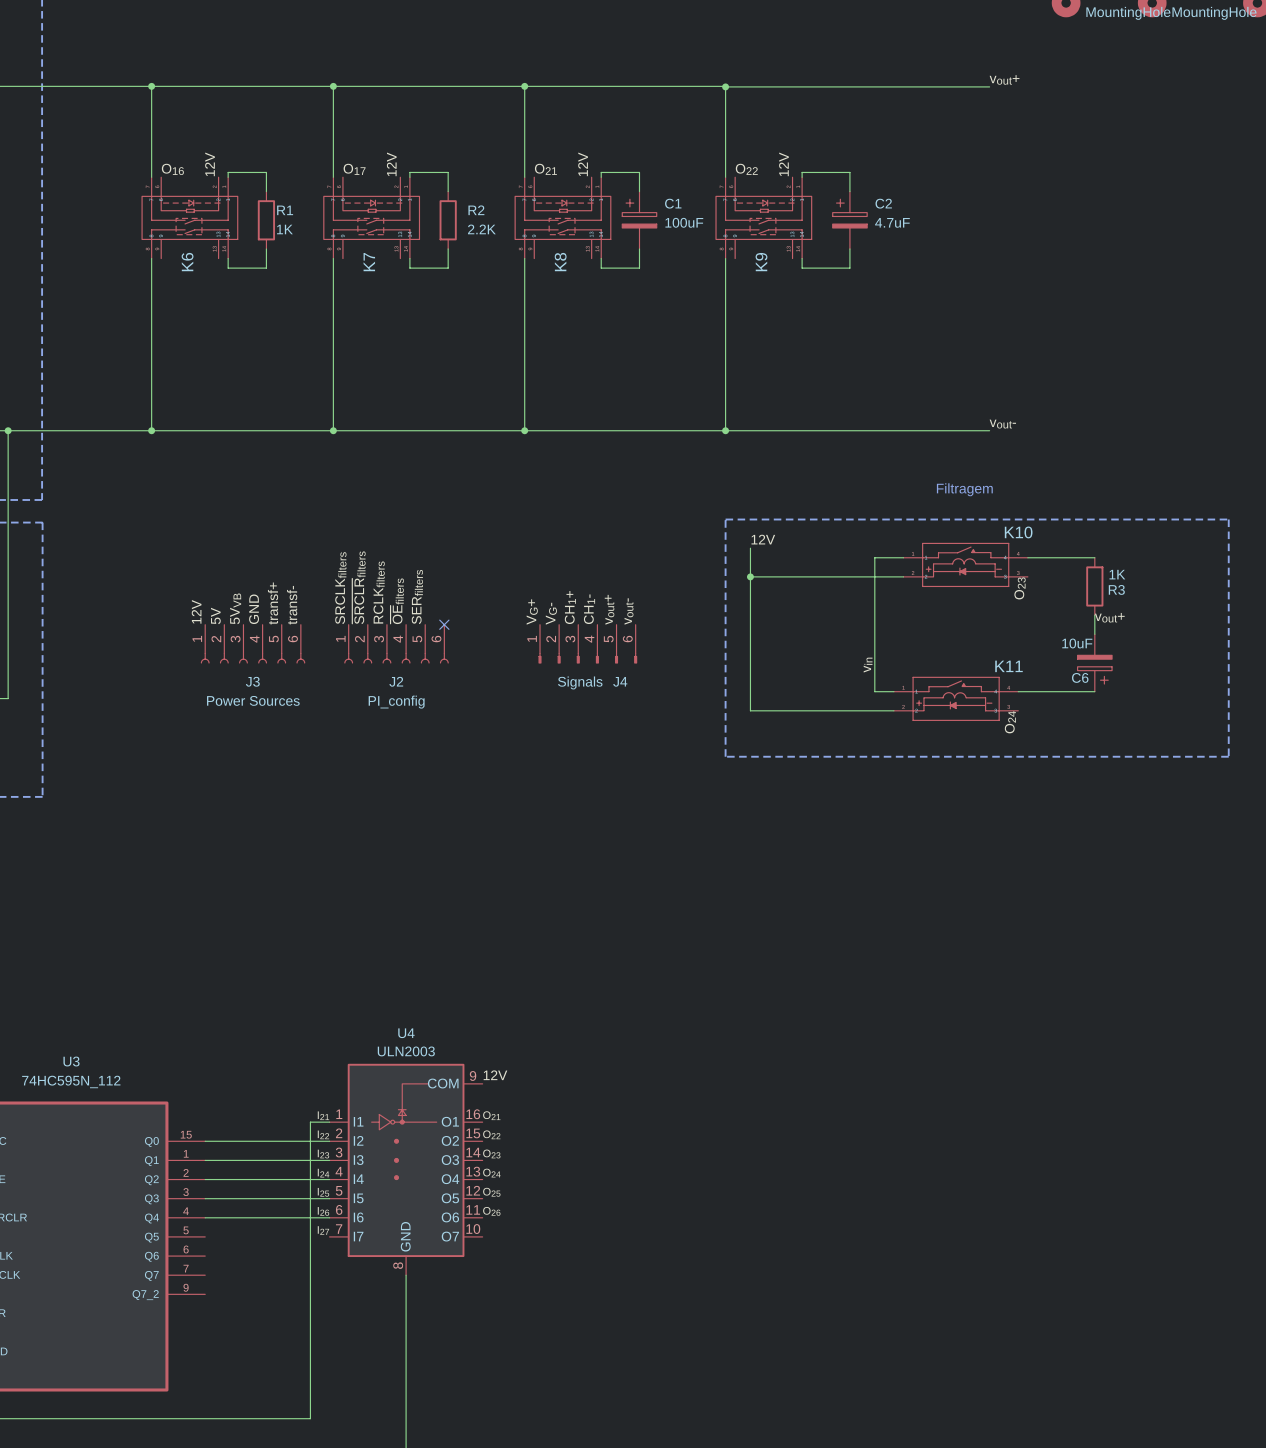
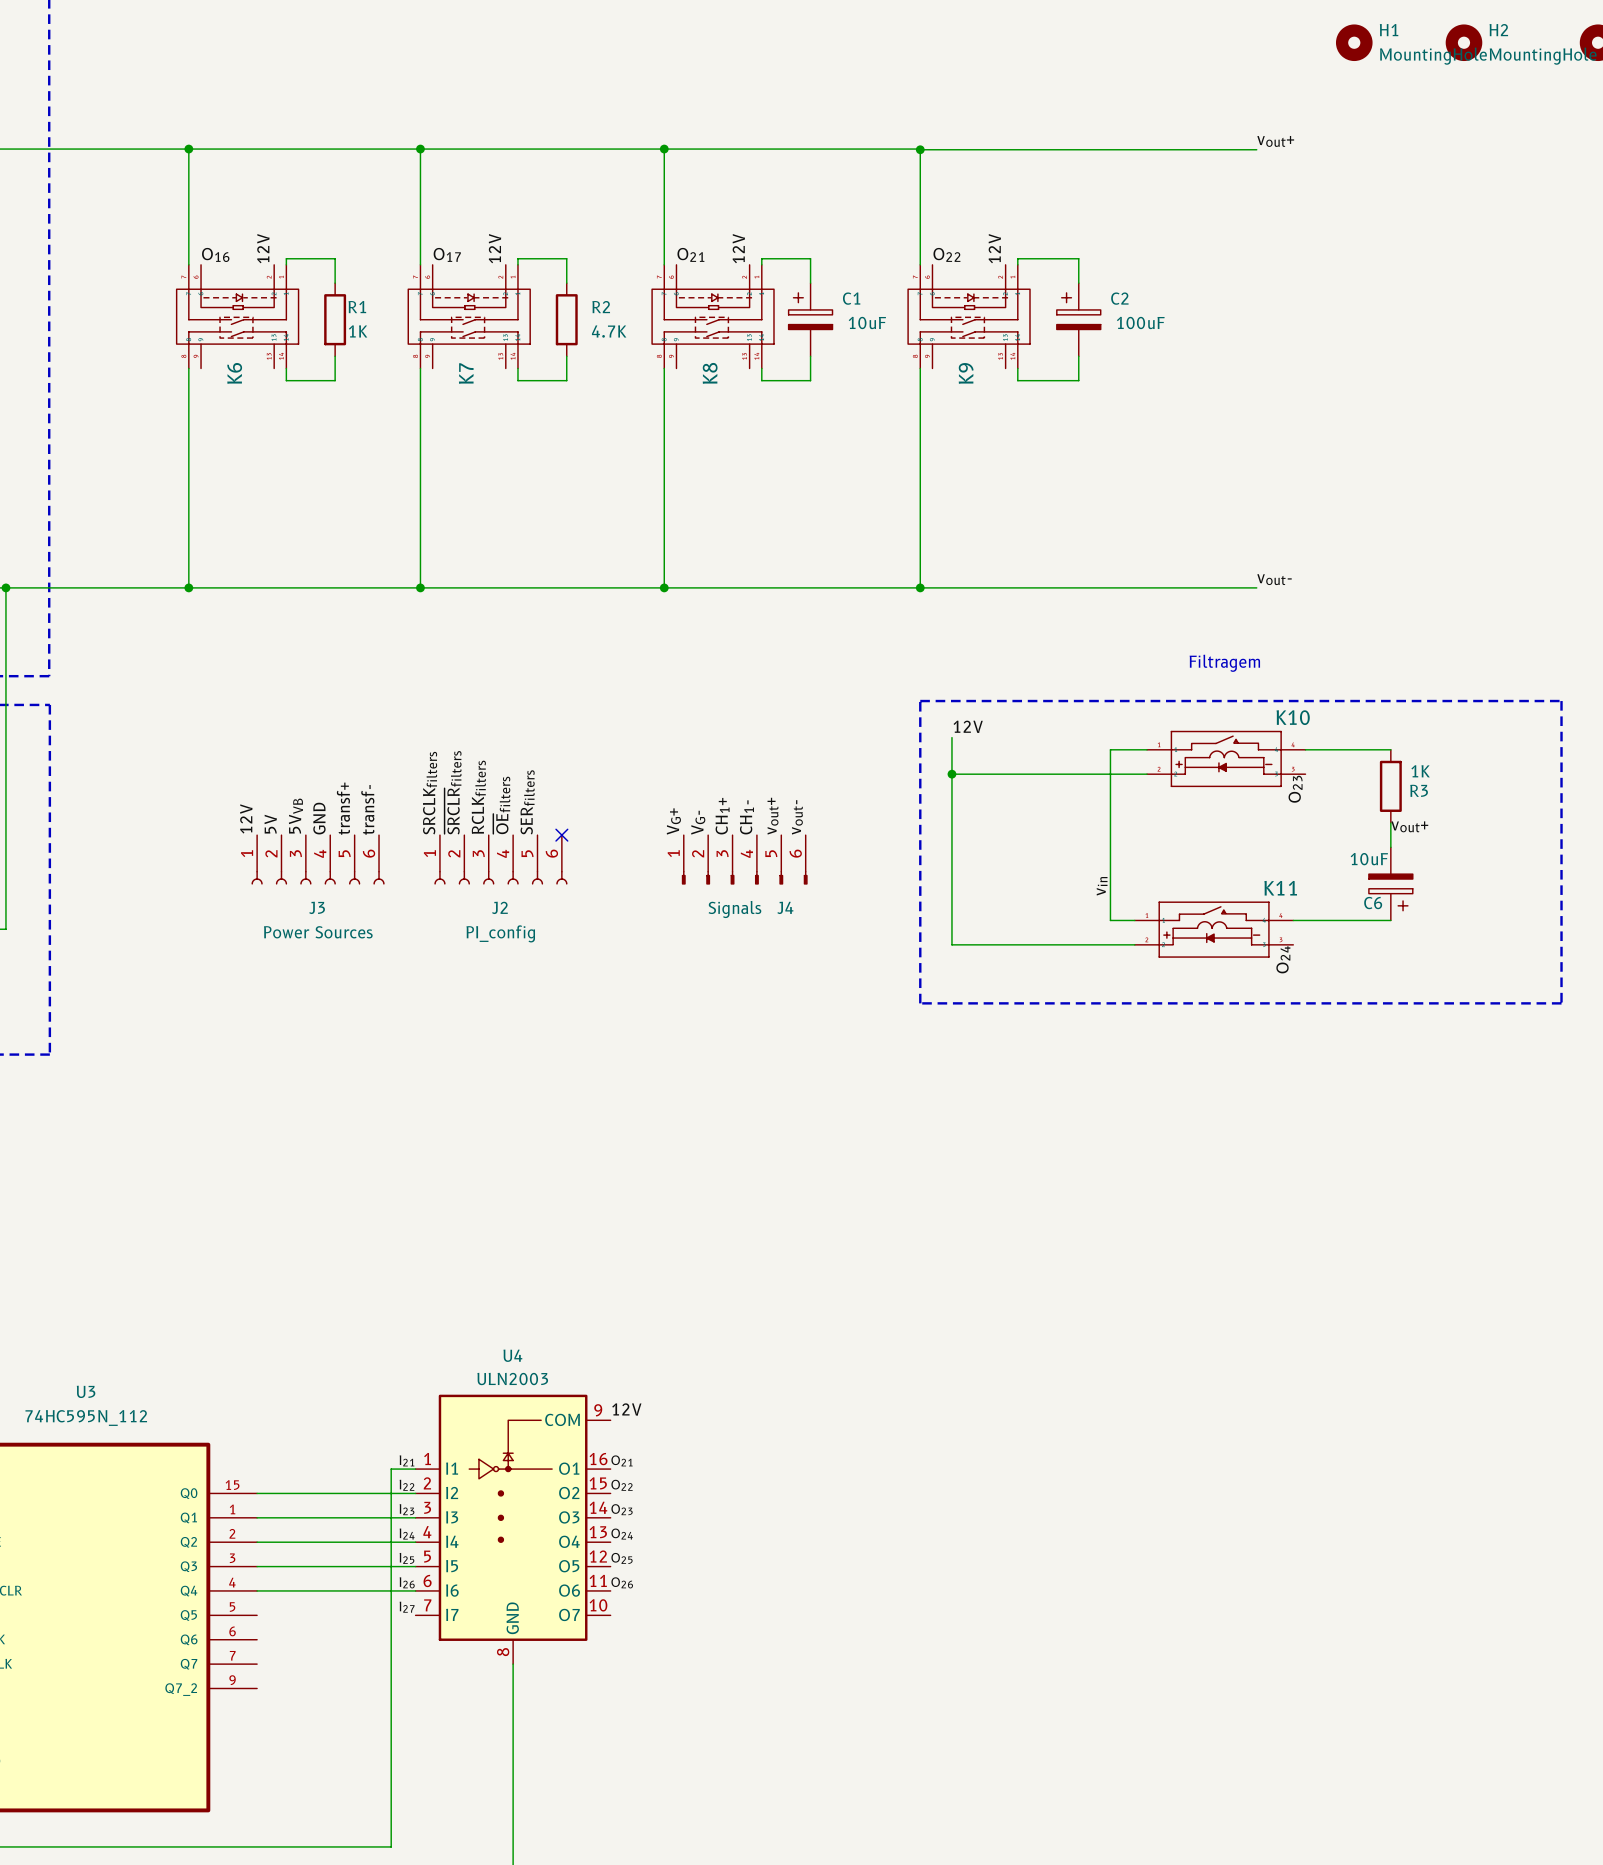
C1 value: 100uF (684, 222) -> 10uF (867, 322)
C2 value: 4.7uF (892, 222) -> 100uF (1140, 322)
R2 value: 2.2K (481, 229) -> 4.7K (609, 331)

